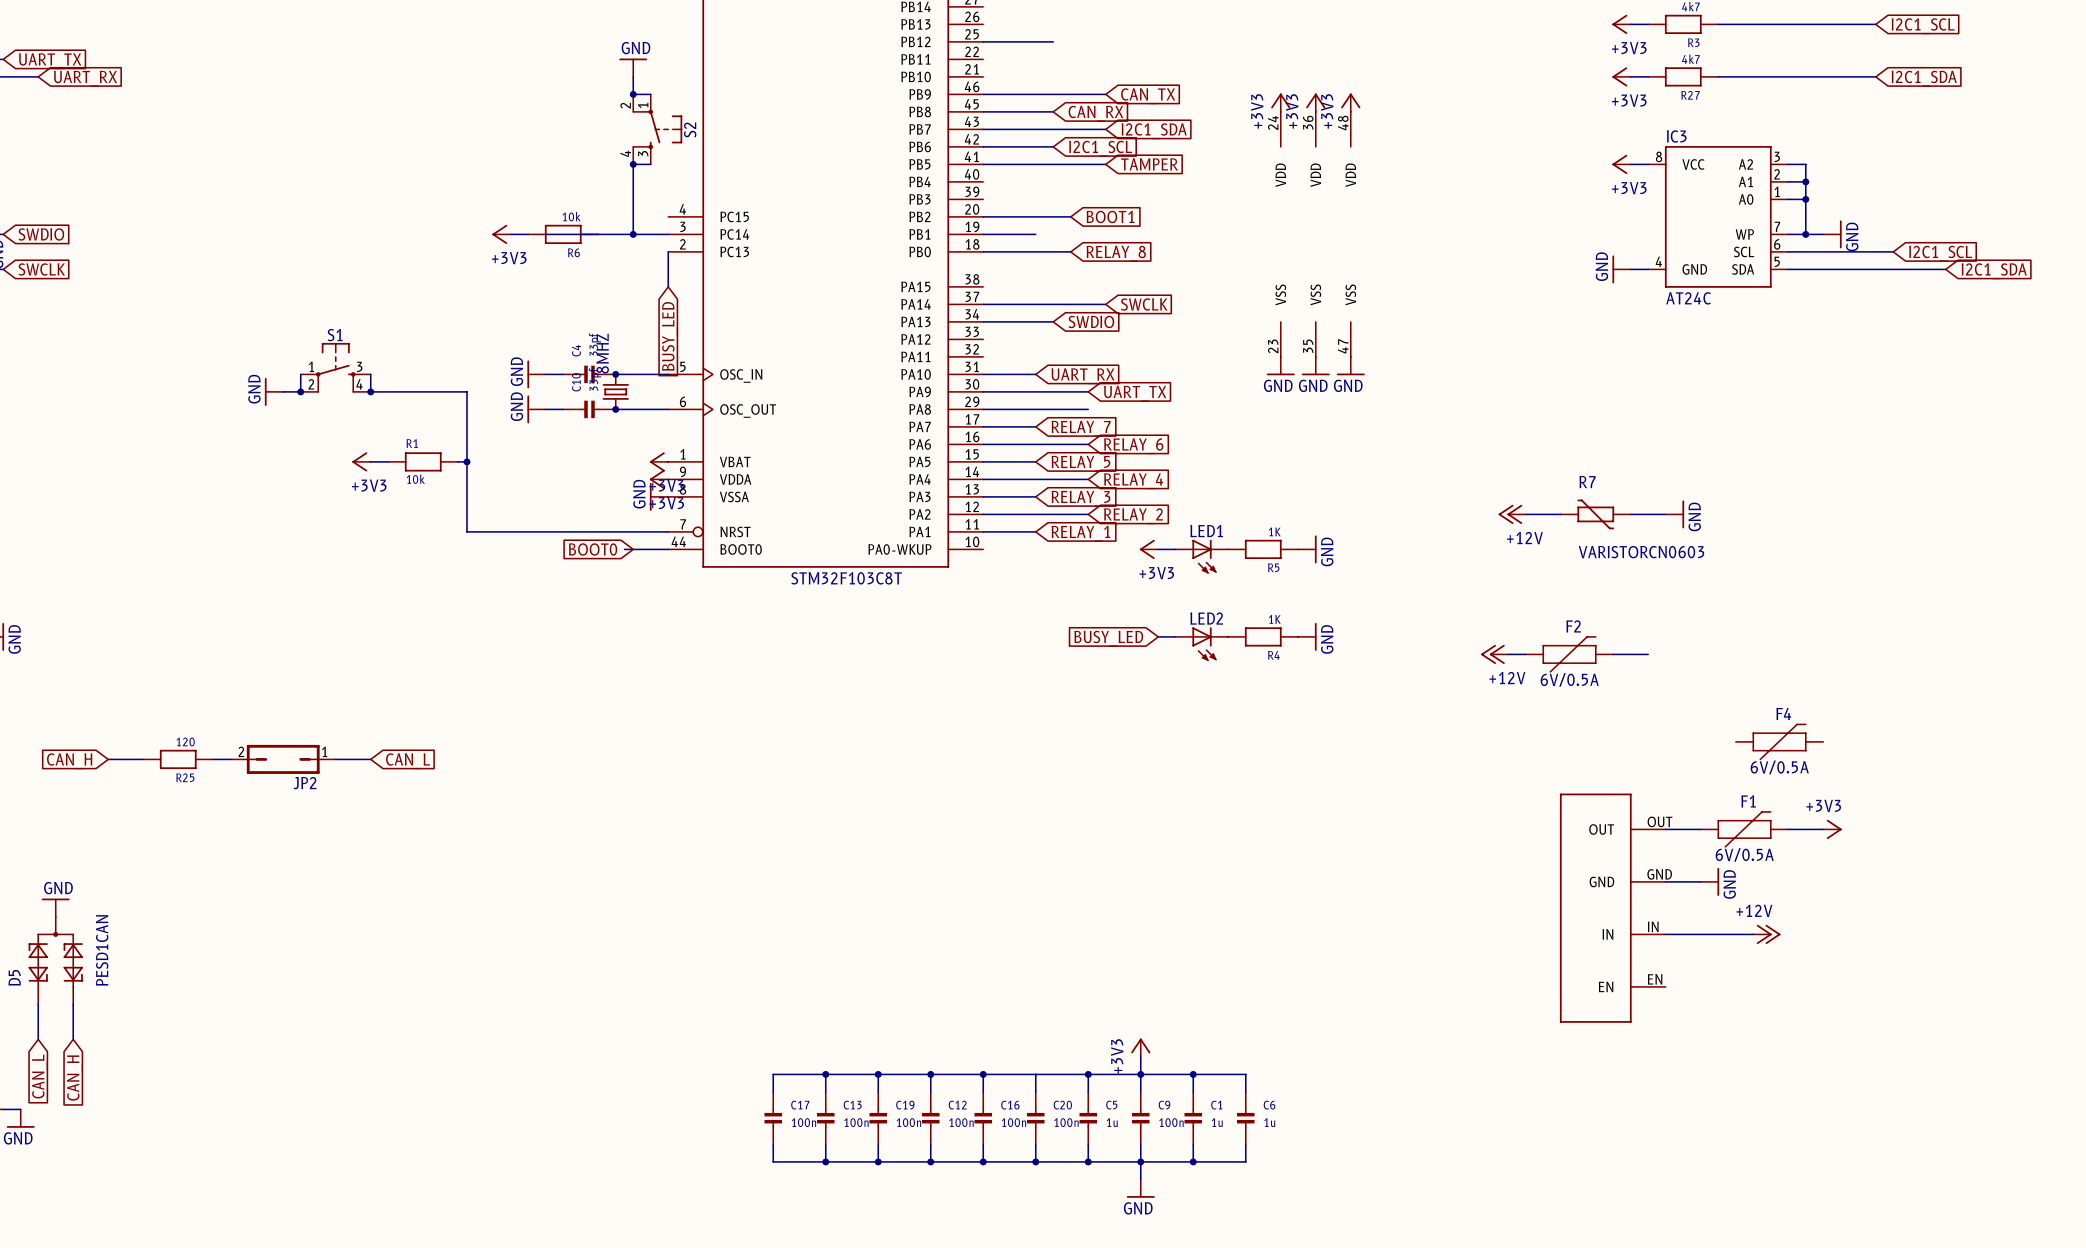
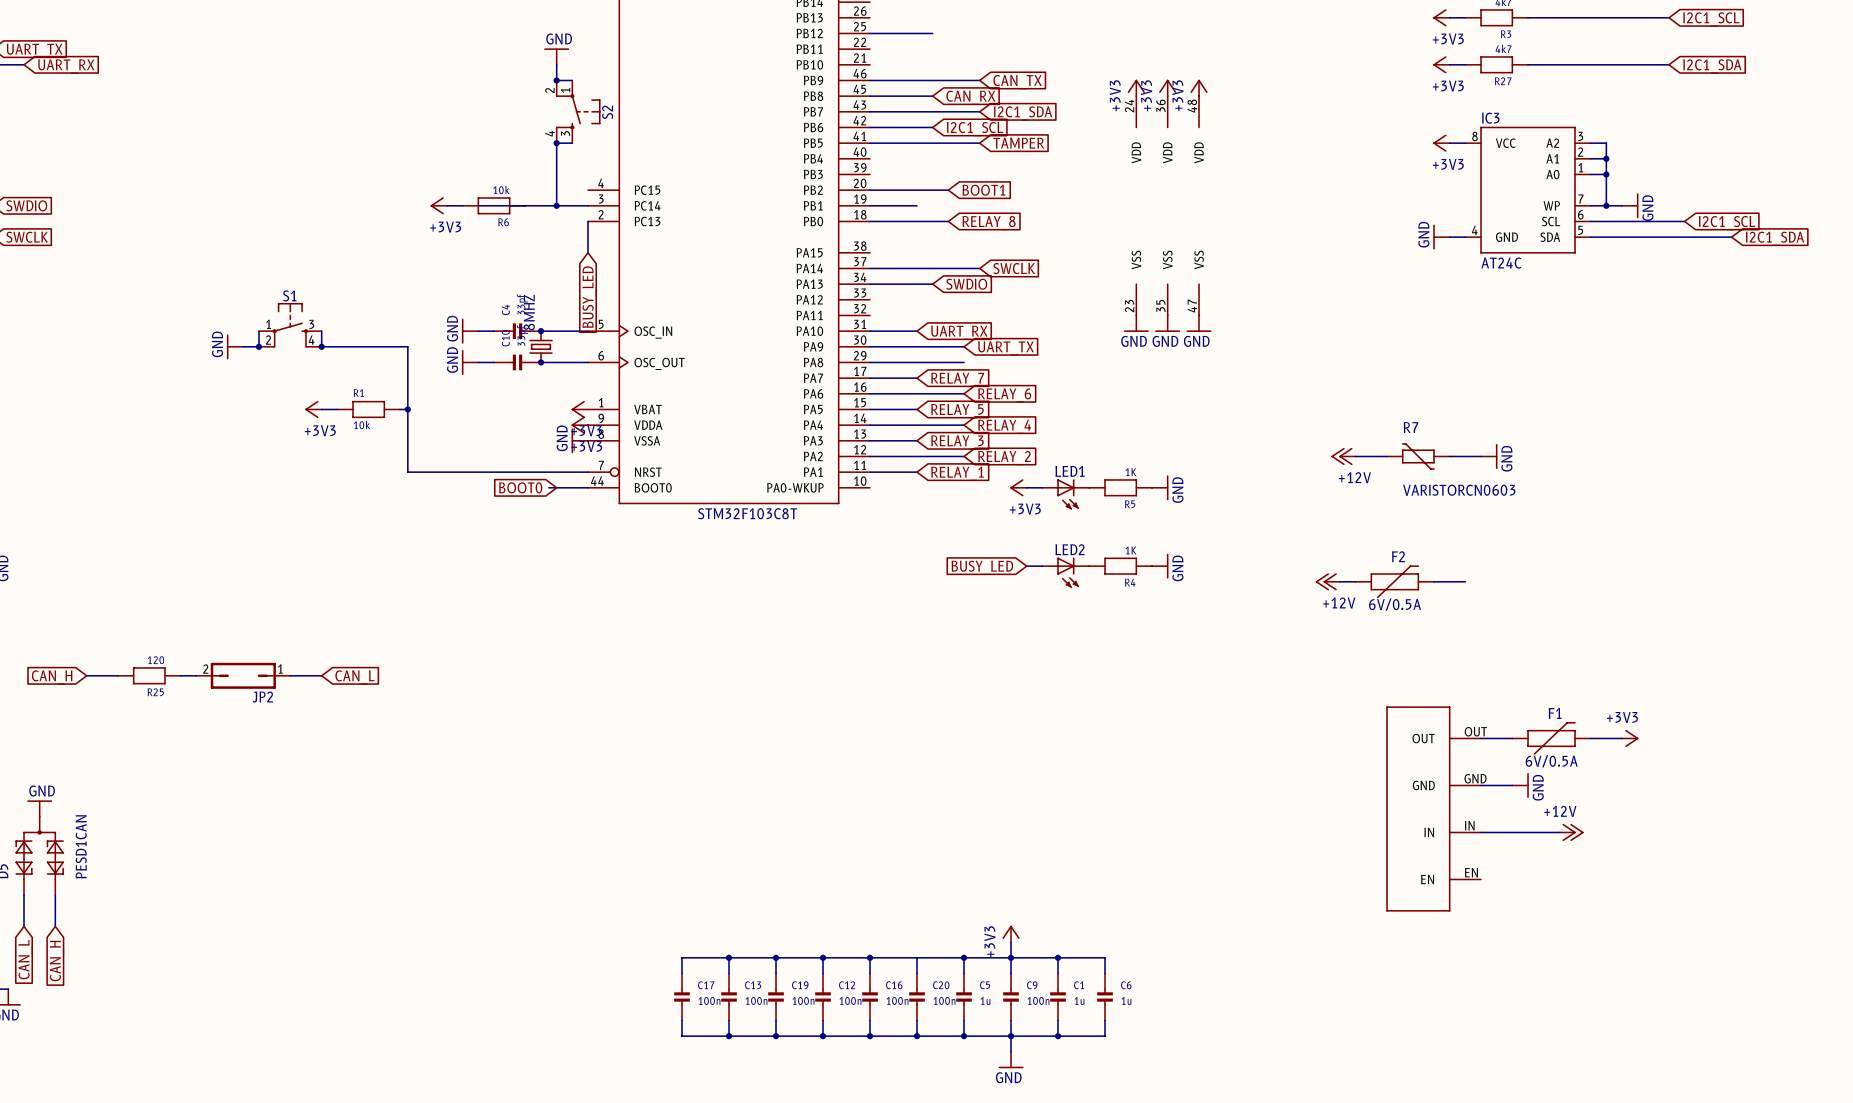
F4: 6V/0.5A (1779, 741) -> none

